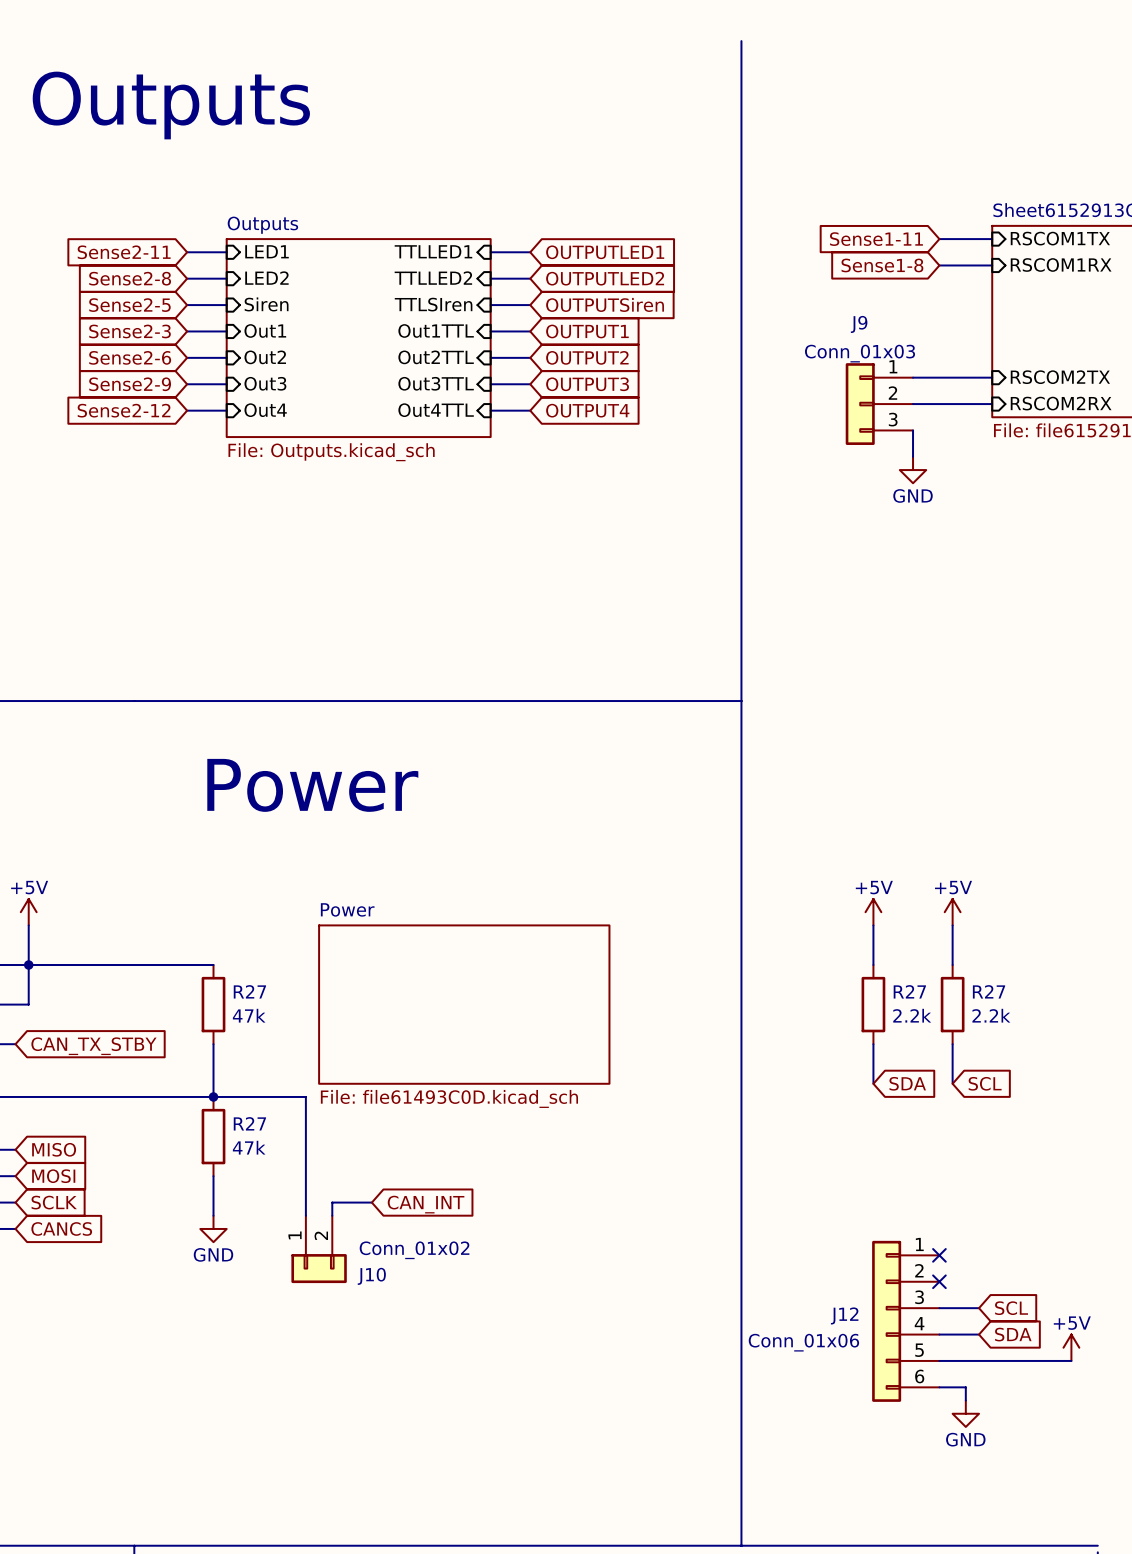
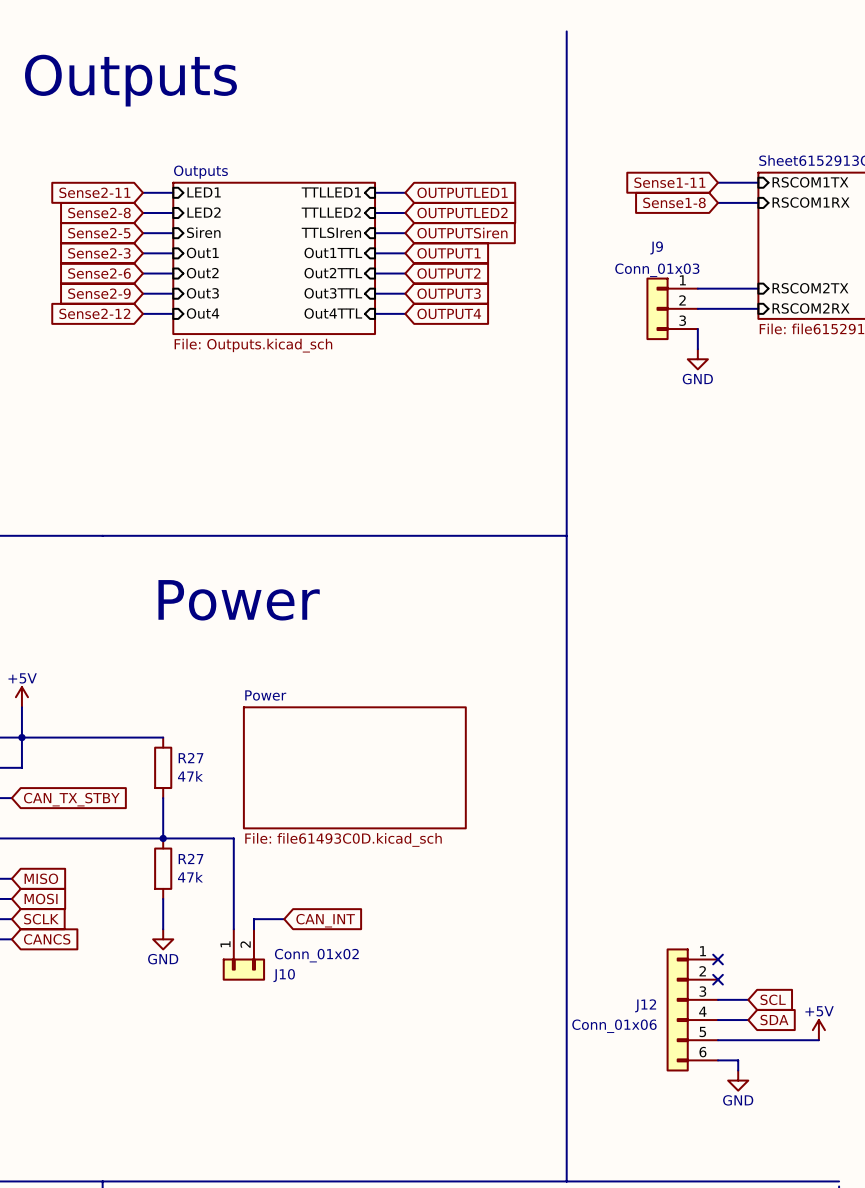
power symbol: +5V (873, 912) -> none
power symbol: +5V (952, 912) -> none
wire: (873, 925) (873, 965) -> none
wire: (952, 925) (952, 965) -> none
R27: 2.2k (873, 1004) -> none
R27: 2.2k (952, 1004) -> none
wire: (873, 1044) (873, 1083) -> none
wire: (952, 1044) (952, 1083) -> none
global label: SDA (907, 1083) -> none
global label: SCL (985, 1083) -> none

